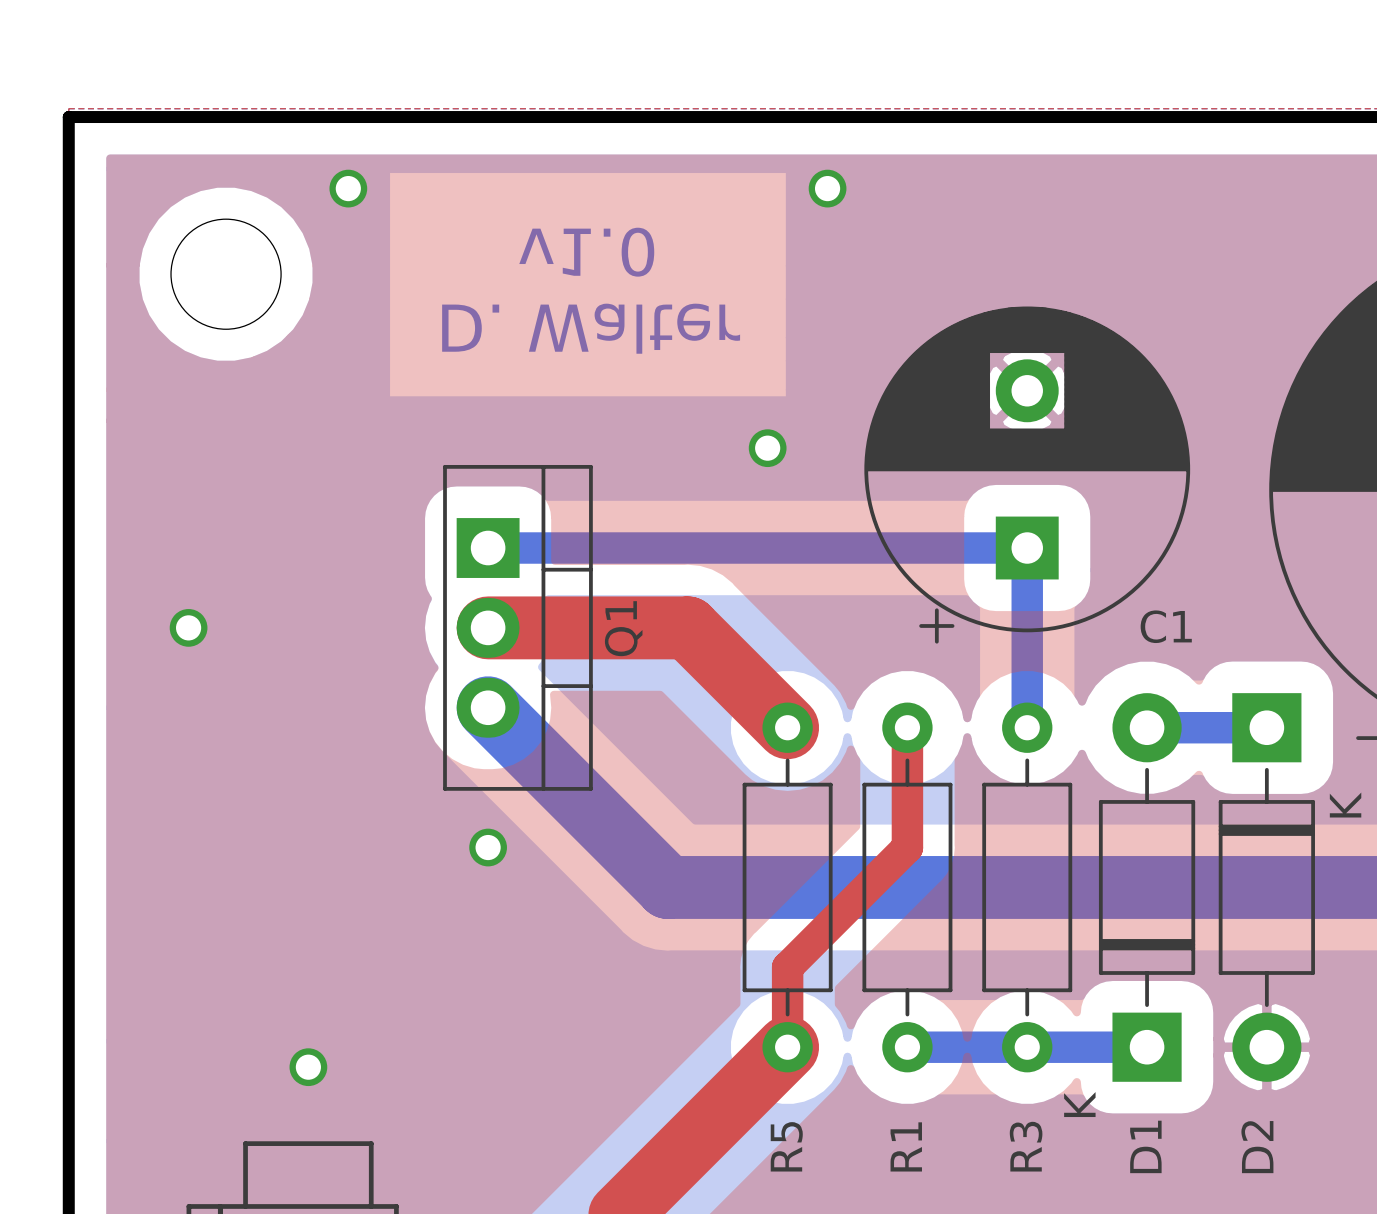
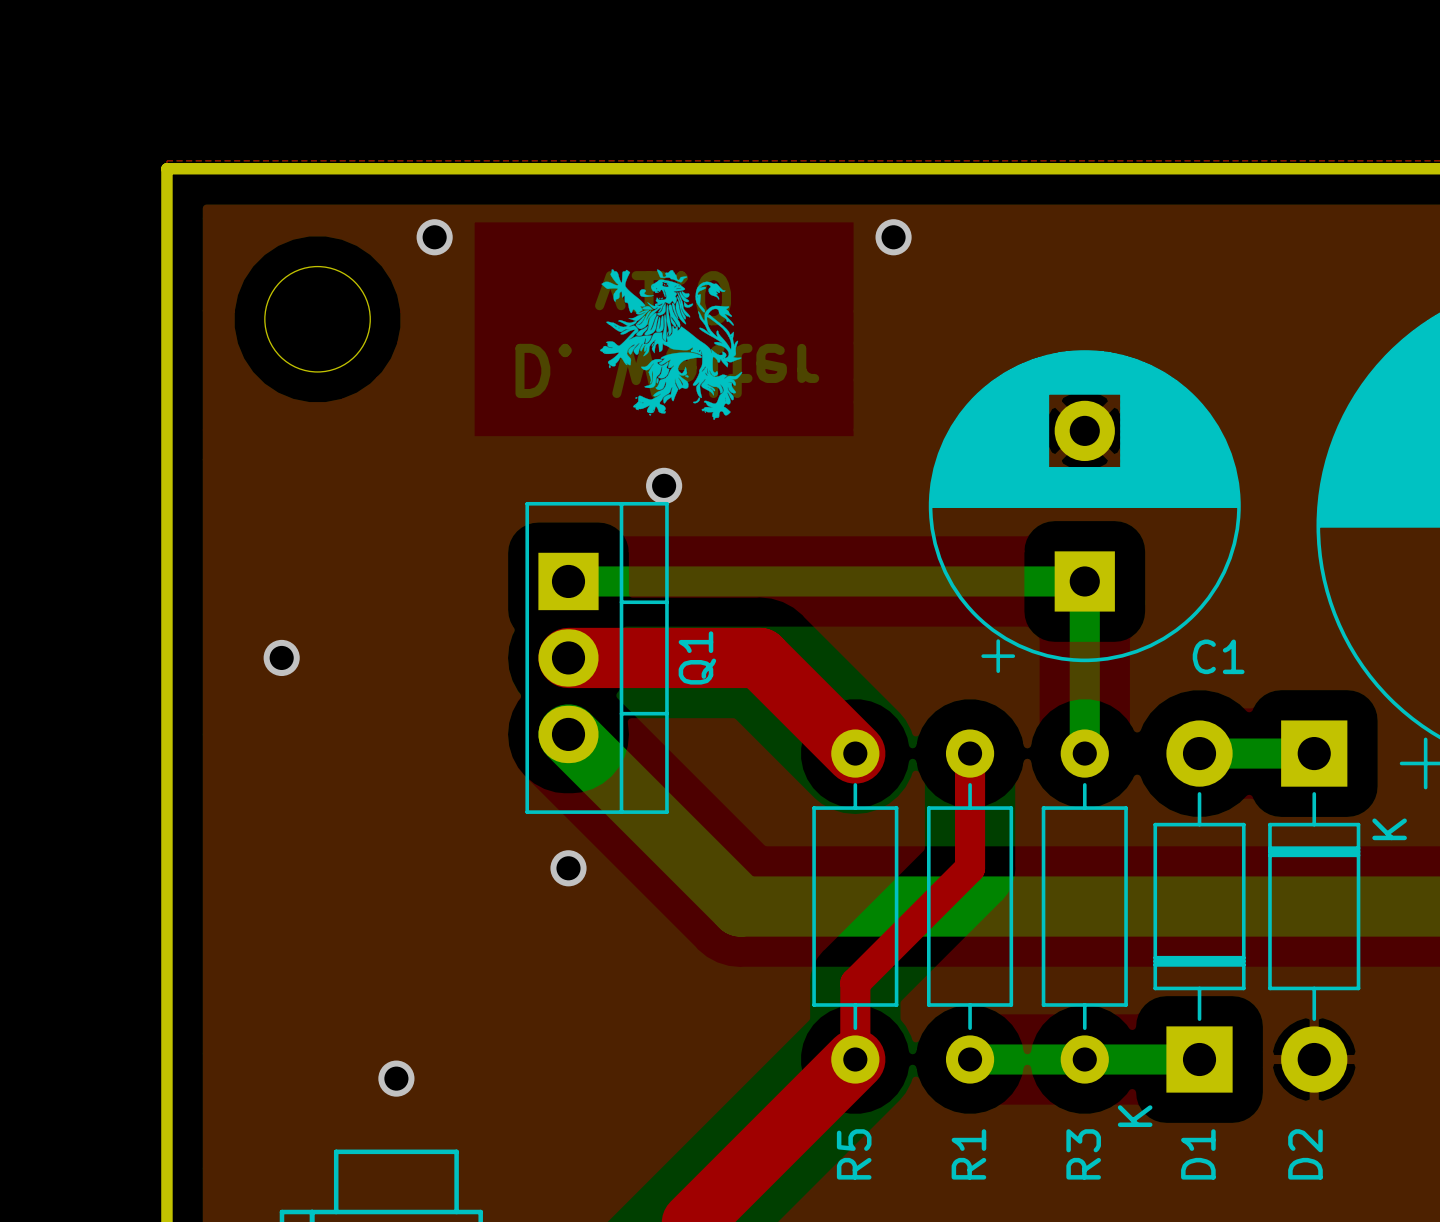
drawing: none -> [600, 269, 743, 420]
via position: (767, 448) -> (664, 485)

